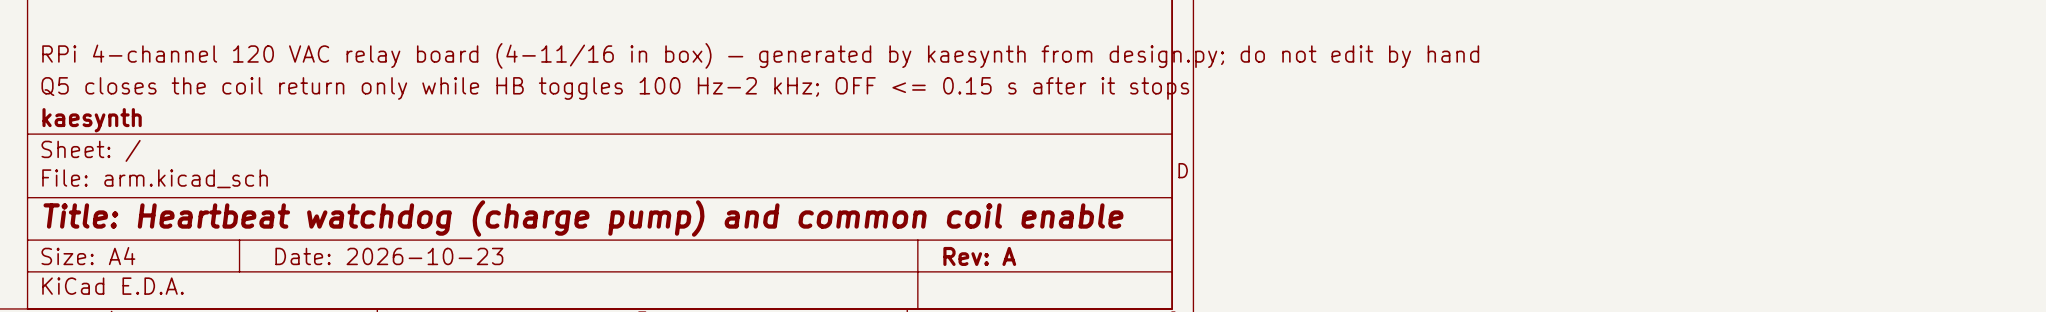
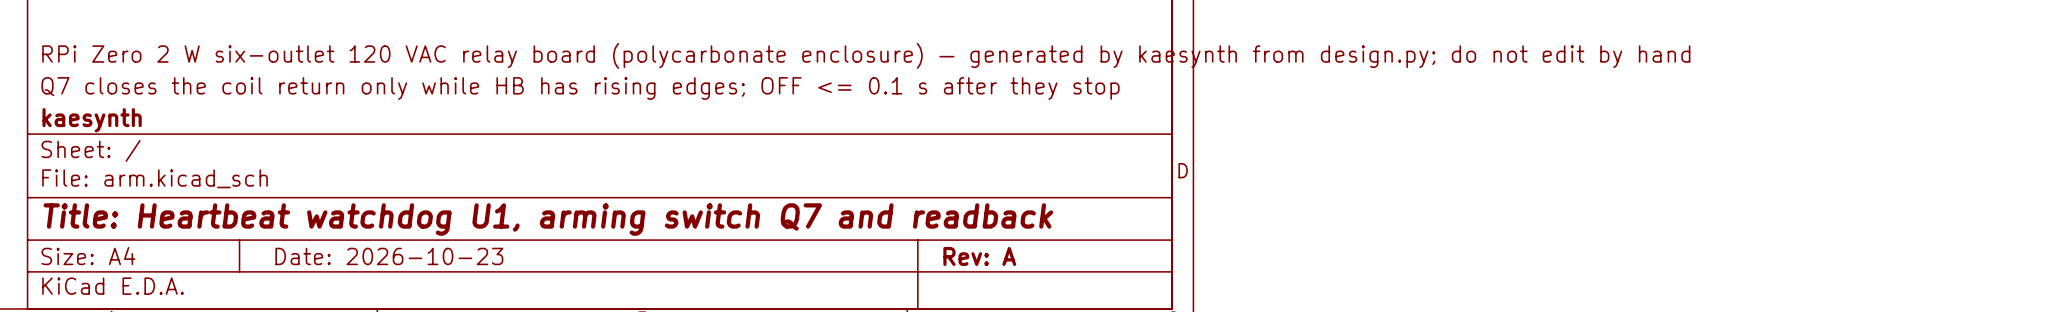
title block: RPi 4-channel 120 VAC relay board (4-11/16 in box) — generated by kaesynth from design.py; do not edit by hand (760, 55) -> RPi Zero 2 W six-outlet 120 VAC relay board (polycarbonate enclosure) — generated by kaesynth from design.py; do not edit by hand (866, 55)
title block: Q5 closes the coil return only while HB toggles 100 Hz-2 kHz; OFF <= 0.15 s after it stops (615, 88) -> Q7 closes the coil return only while HB has rising edges; OFF <= 0.1 s after they stop (580, 88)
title block: Title: Heartbeat watchdog (charge pump) and common coil enable (583, 218) -> Title: Heartbeat watchdog U1, arming switch Q7 and readback (548, 219)

